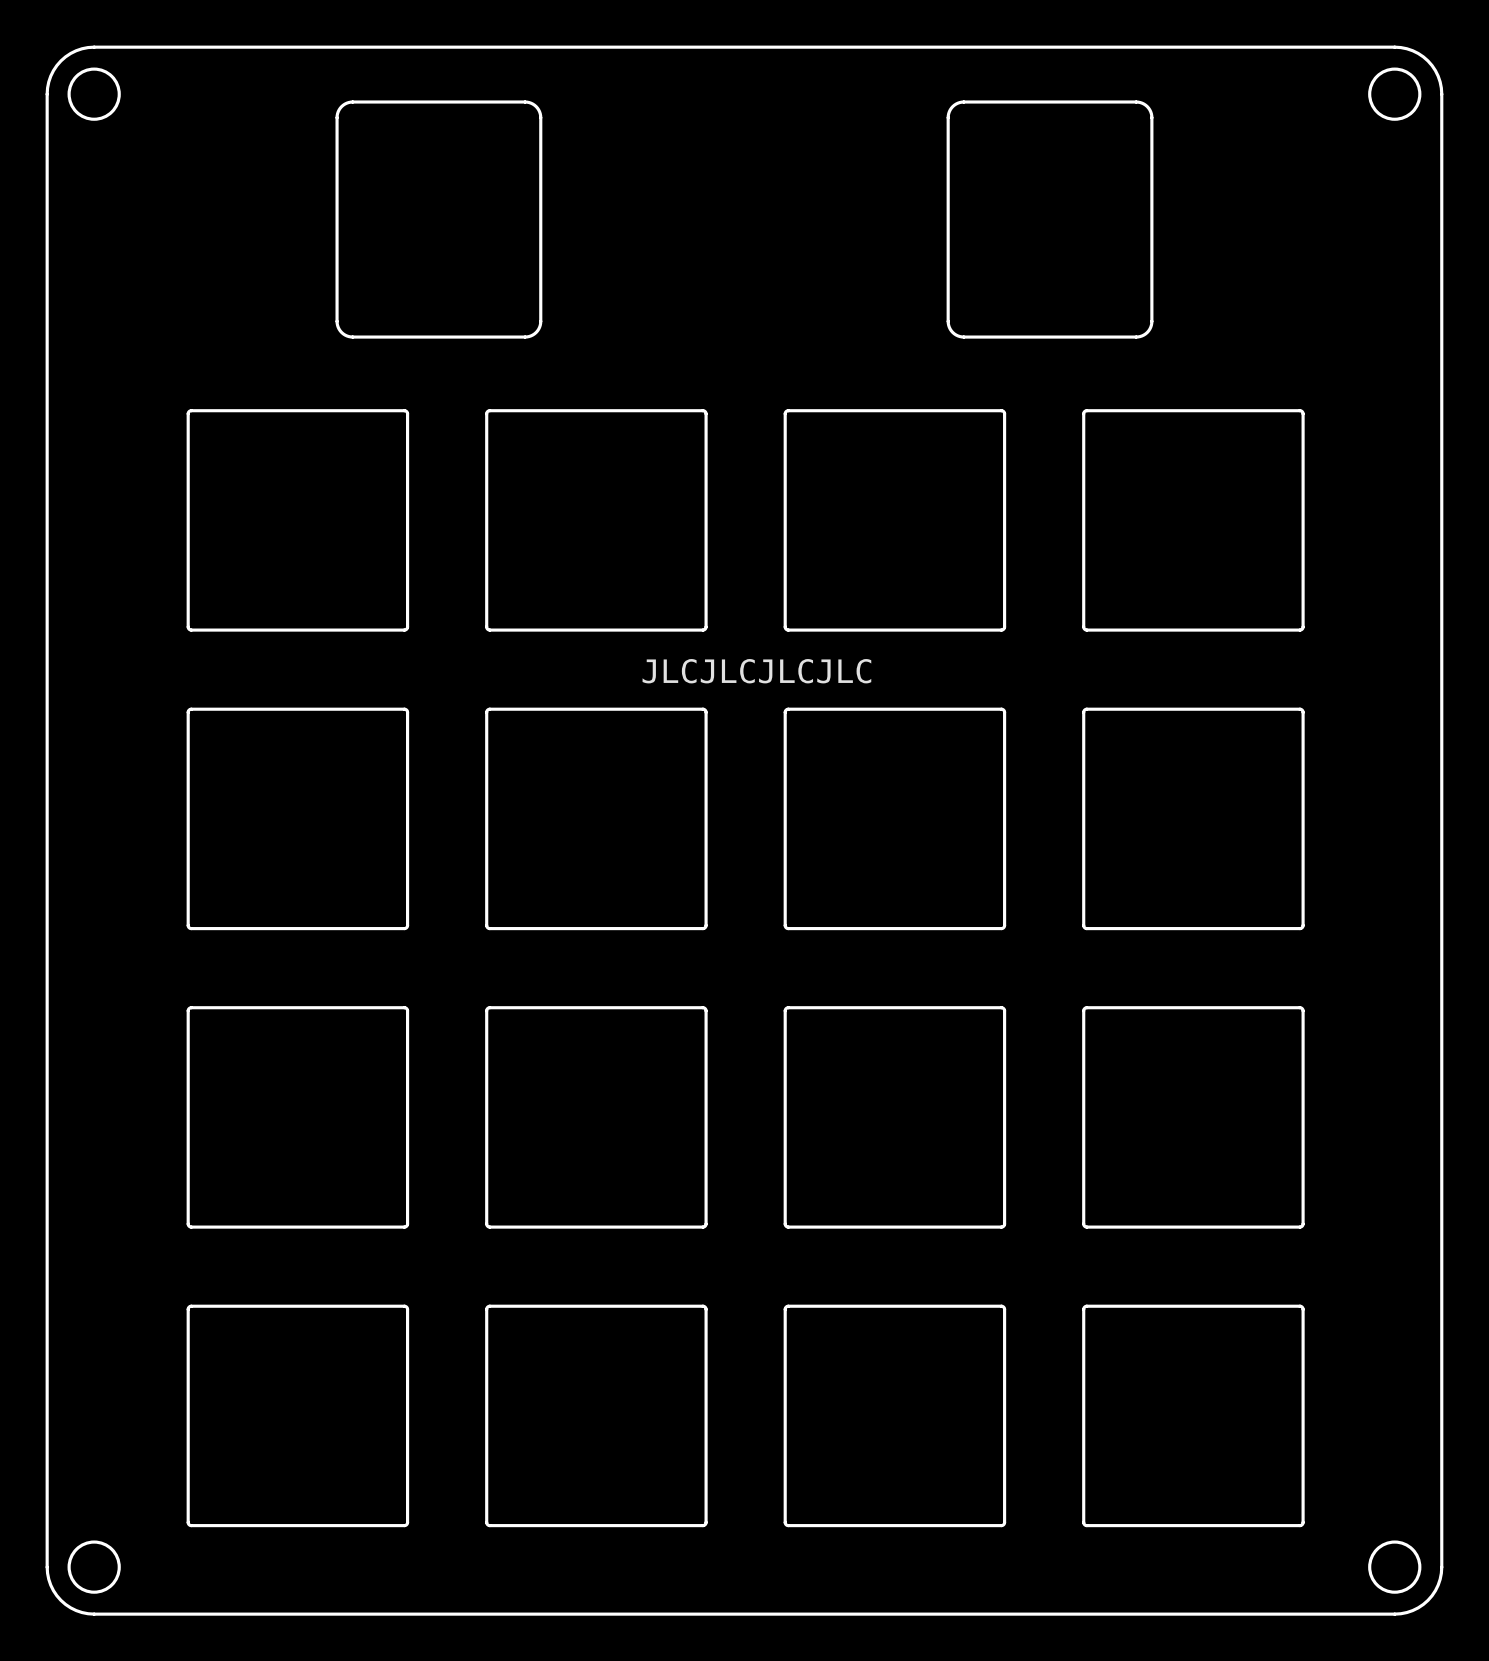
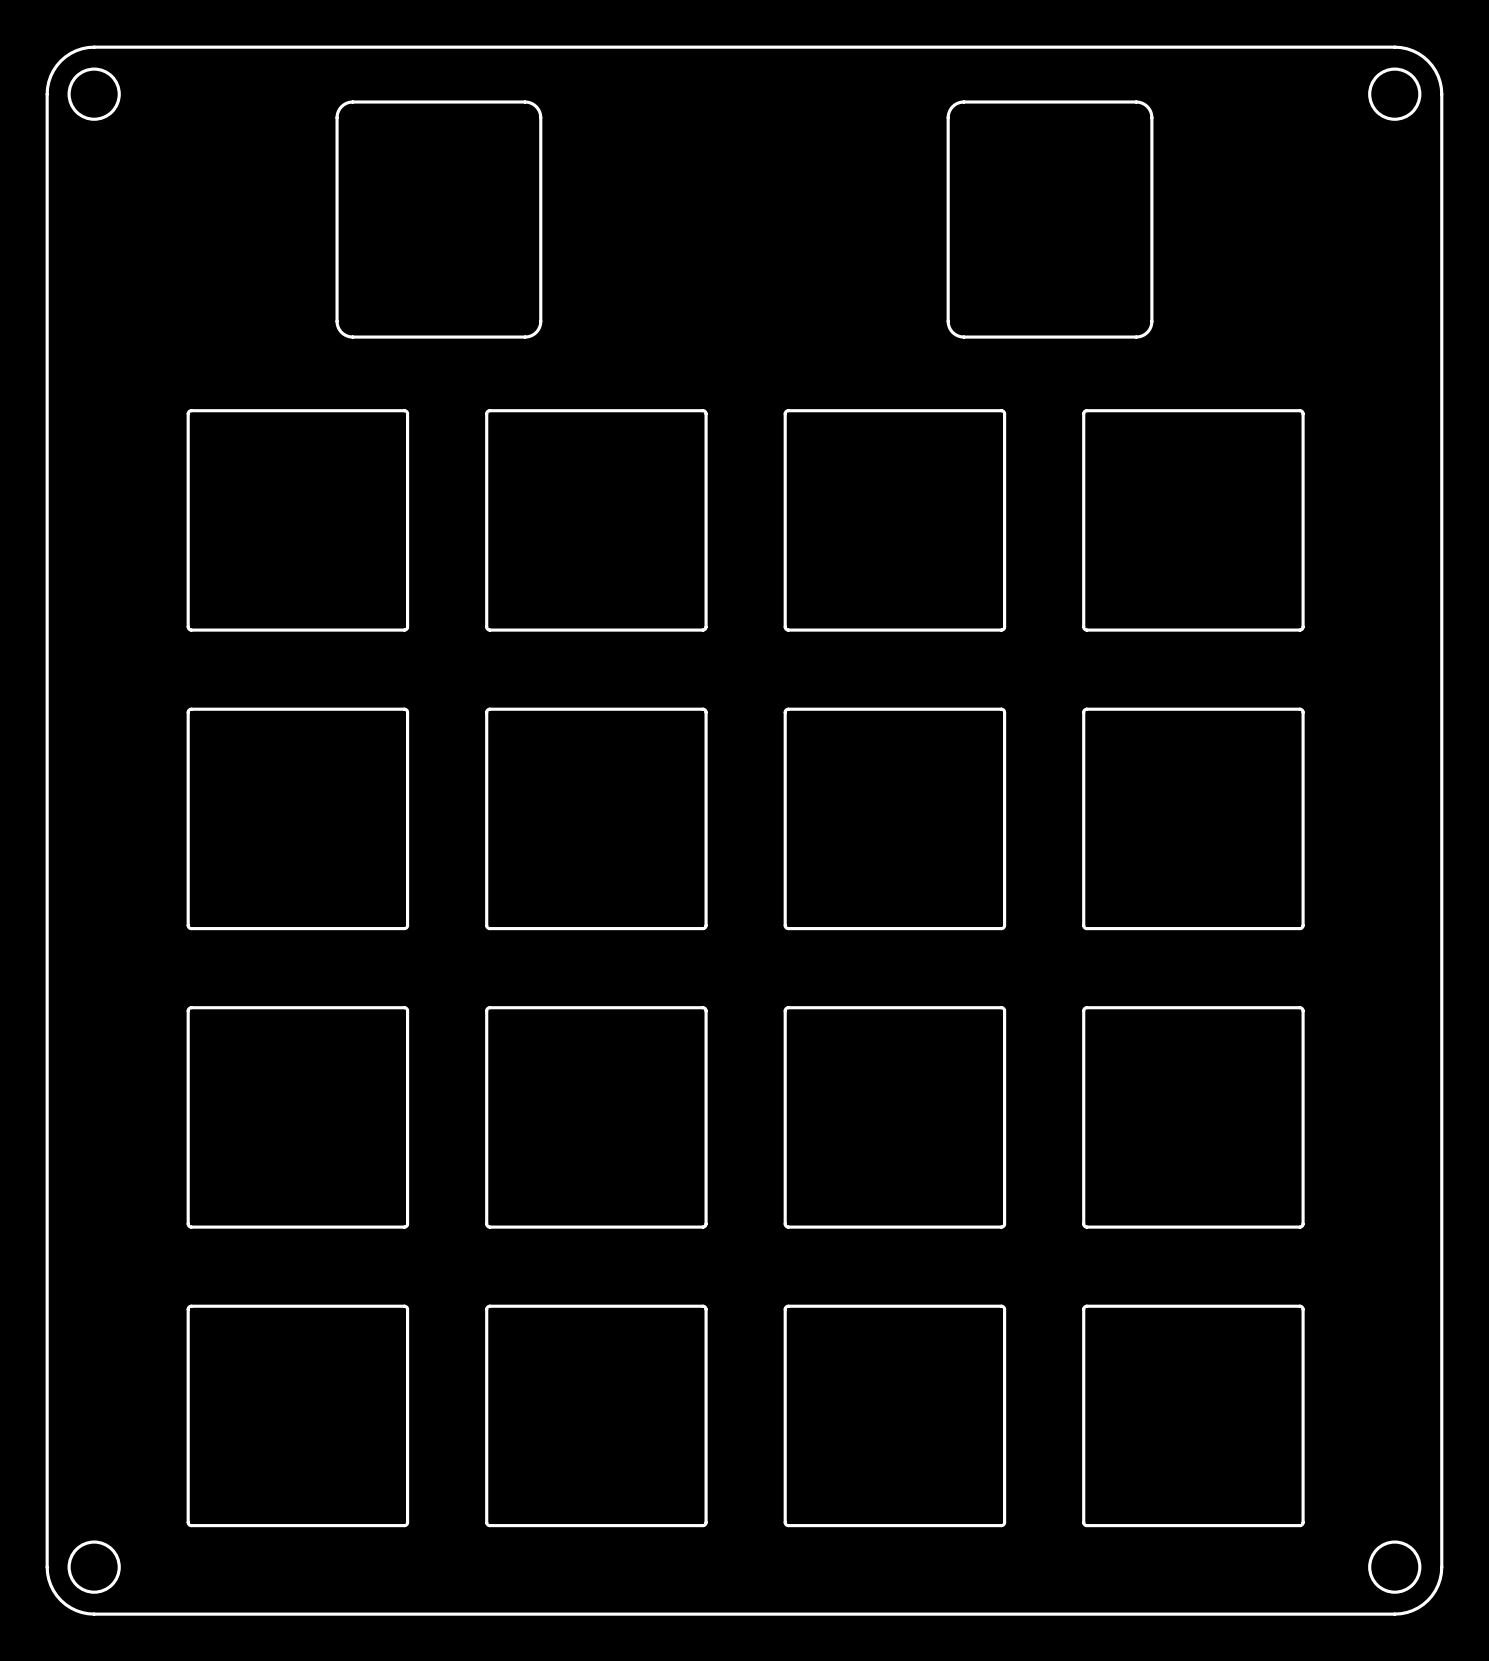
text: JLCJLCJLCJLC (756, 671) -> none

